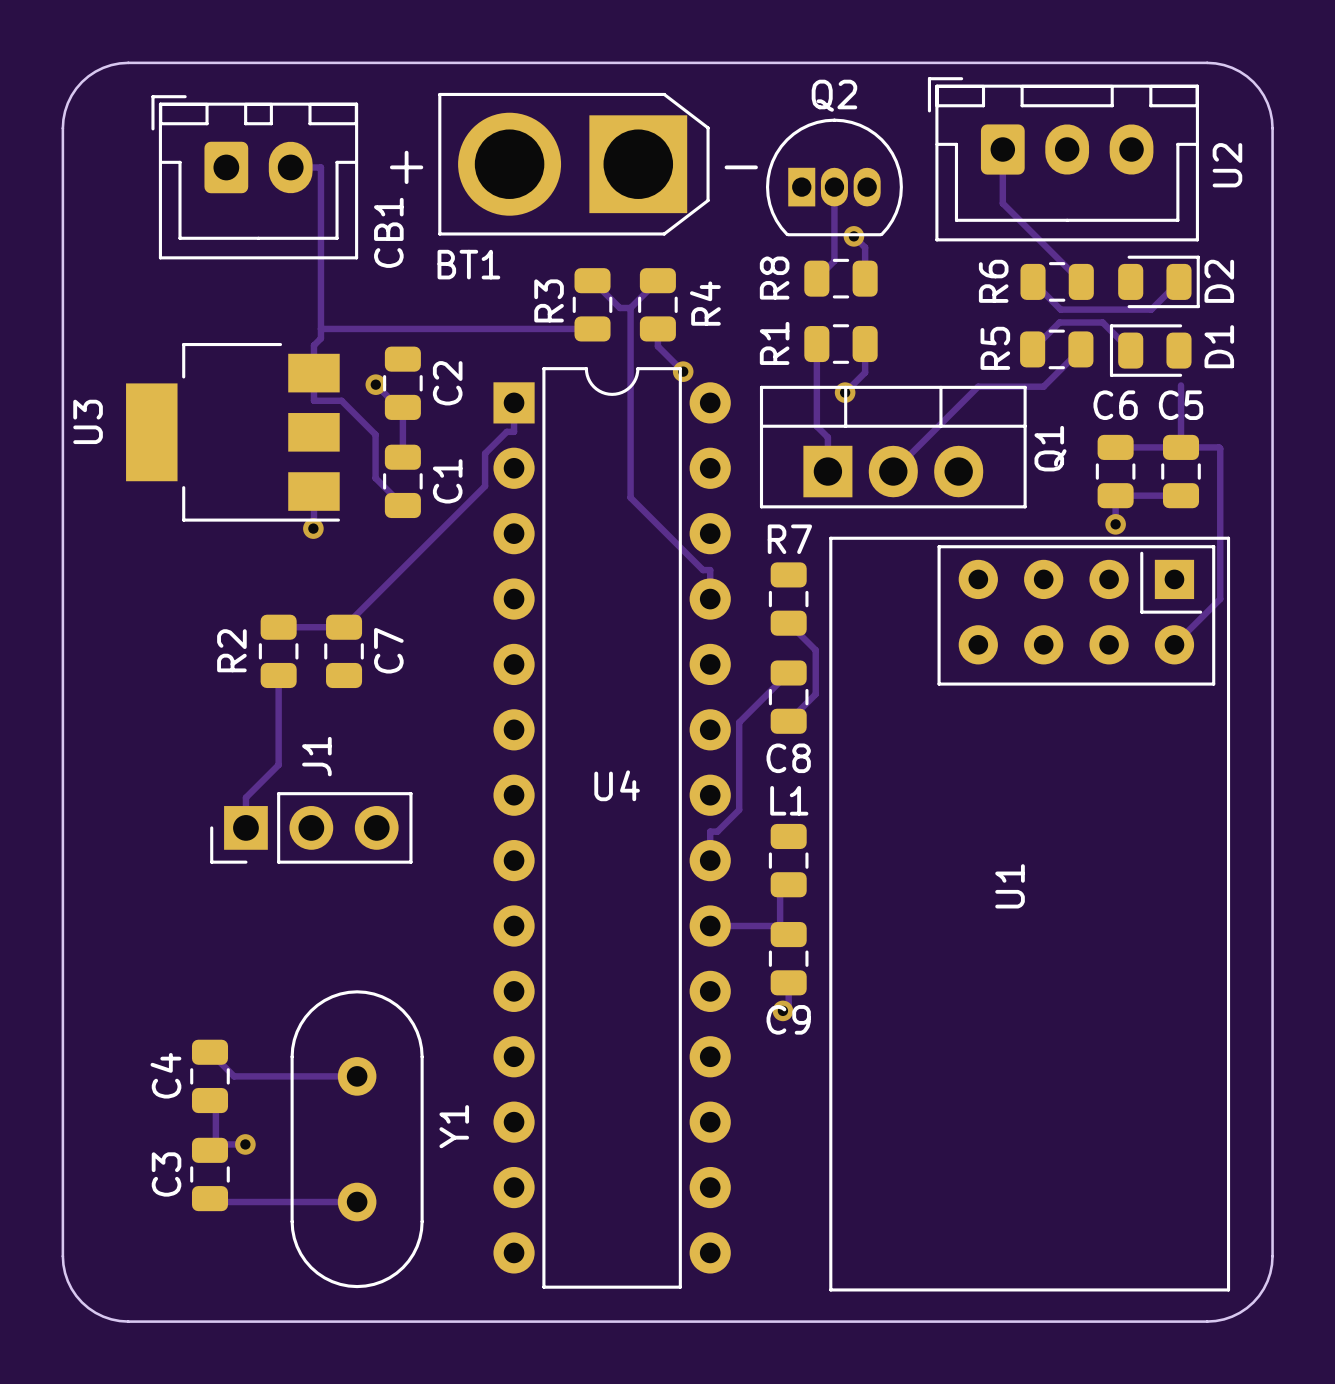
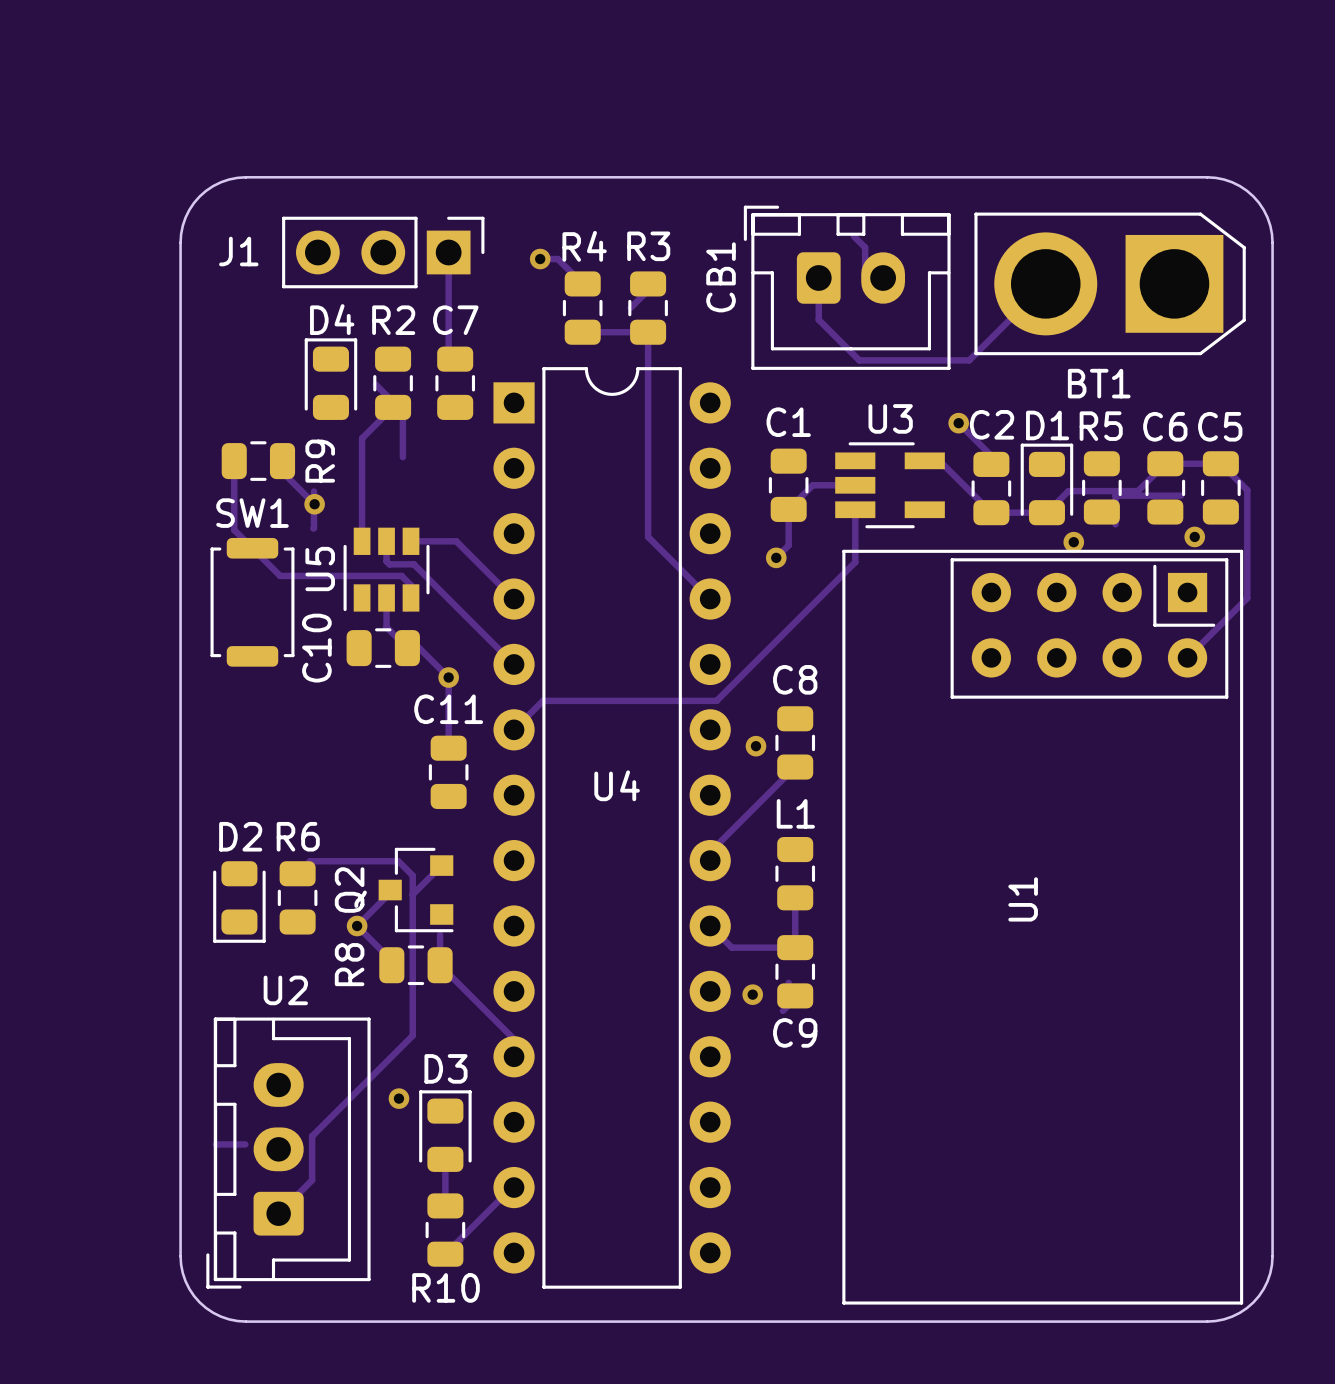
Q2 name position: Q2 (834, 95) -> Q2 (350, 890)
Q2 footprint: [765, 118, 903, 237] -> [378, 847, 454, 933]
track: (1002, 149) (1002, 203) (1081, 281) -> none
U2 rotation: 0° (1063, 159) -> 90° counterclockwise (288, 1153)
U2 position: (1063, 159) -> (288, 1153)
BT1 position: (573, 164) -> (1110, 283)
track: (290, 167) (320, 167) (320, 338) (313, 345) (313, 400) (341, 400) (375, 434) (375, 478) (402, 505) -> none
BT1 text: + (406, 167) -> none
BT1 text: - (741, 167) -> none
CB1 position: (254, 177) -> (847, 287)
track: (834, 187) (834, 261) (816, 278) -> none
CB1 name position: CB1 (388, 232) -> CB1 (721, 277)
via: (853, 236) -> none
board edge: (1272, 242) (1272, 128) (1270, 111) (1263, 95) (1253, 82) (1232, 67) (1215, 63) (128, 62) (103, 67) (82, 82) (67, 103) (62, 128) (62, 1256) (67, 1281) (82, 1302) (103, 1316) (128, 1321) -> (1272, 242) (1267, 217) (1253, 196) (1232, 182) (1207, 177)
track: none -> (448, 252) (448, 352) (455, 359)
track: none -> (540, 259) (557, 259) (582, 283)
via: none -> (540, 259)
BT1 name position: BT1 (468, 264) -> BT1 (1099, 383)
track: none -> (818, 277) (818, 319) (859, 360) (969, 360) (1045, 283)
R8 position: (840, 278) -> (415, 965)
track: (592, 280) (619, 307) (630, 307) (630, 497) (702, 570) (710, 570) (710, 599) -> (582, 332) (648, 332) (648, 536) (710, 599)
track: (1033, 281) (1060, 309) (1151, 309) (1178, 281) -> none
R6 rotation: 0° (1057, 281) -> 90° clockwise (297, 897)
R6 position: (1057, 281) -> (297, 897)
D2 rotation: 0° (1158, 281) -> 90° clockwise (239, 901)
D2 position: (1158, 281) -> (239, 901)
D2 name position: D2 (1219, 281) -> D2 (240, 836)
R3 name rotation: 0° (549, 300) -> 90° clockwise (648, 246)
R3 name position: R3 (549, 300) -> R3 (648, 246)
R4 name rotation: 0° (705, 303) -> 90° clockwise (584, 246)
R4 name position: R4 (705, 303) -> R4 (584, 246)
R3 position: (592, 304) -> (648, 308)
R4 position: (657, 304) -> (582, 308)
track: (320, 328) (592, 328) -> none
track: (657, 328) (657, 346) (683, 371) -> none
U3 footprint: [126, 342, 340, 522] -> [835, 442, 945, 529]
track: (816, 344) (816, 426) (827, 437) (827, 471) -> none
R1: (840, 344) -> none
track: (865, 344) (865, 372) (845, 392) -> none
D1 name position: D1 (1219, 346) -> D1 (1047, 425)
track: (1032, 349) (1059, 322) (1102, 322) (1130, 350) -> none
R5 rotation: 0° (1056, 349) -> 90° clockwise (1101, 487)
R5 position: (1056, 349) -> (1101, 487)
track: (1080, 349) (1043, 386) (978, 386) (893, 471) -> none
D1 rotation: 0° (1150, 350) -> 90° clockwise (1046, 484)
D1 position: (1150, 350) -> (1046, 484)
via: (683, 371) -> none
D4: none -> (330, 379)
C2 position: (402, 383) -> (991, 488)
C2 name rotation: 0° (447, 383) -> 90° clockwise (992, 424)
C2 name position: C2 (447, 383) -> C2 (992, 424)
via: (375, 384) -> none
track: (1181, 385) (1181, 447) -> none
via: (845, 392) -> none
track: (514, 402) (514, 431) (506, 431) (485, 453) (485, 486) (344, 627) (278, 627) -> none
C6 name position: C6 (1115, 405) -> C6 (1165, 426)
C5 name position: C5 (1181, 405) -> C5 (1220, 426)
track: none -> (393, 407) (362, 438) (362, 541)
U3 name position: U3 (88, 421) -> U3 (890, 418)
track: none -> (958, 423) (991, 455) (991, 464)
via: none -> (958, 423)
Q1: (893, 447) -> none
track: (1115, 447) (1220, 448) (1220, 599) (1174, 644) -> none
track: none -> (924, 460) (939, 460) (991, 512) (1046, 512) (1068, 491) (1137, 491) (1165, 463) (1220, 463) (1247, 490) (1247, 598) (1187, 657)
track: none -> (234, 461) (234, 530) (280, 575) (401, 575) (411, 585) (411, 597)
R9: none -> (258, 461)
C6 position: (1115, 471) -> (1165, 487)
C5 position: (1181, 471) -> (1220, 487)
track: none -> (282, 472) (314, 504)
C1 position: (402, 481) -> (788, 485)
C1 name rotation: 0° (447, 481) -> 90° clockwise (788, 422)
C1 name position: C1 (447, 481) -> C1 (788, 422)
track: none -> (855, 485) (812, 485) (788, 509) (788, 545) (776, 557)
track: none -> (855, 509) (855, 562) (716, 700) (543, 700) (514, 729)
via: (1115, 524) -> none
via position: (313, 528) -> (314, 504)
via: none -> (1194, 536)
track: none -> (386, 541) (386, 561) (389, 564) (413, 564) (514, 664) (514, 647)
track: none -> (411, 541) (456, 541) (514, 599)
via: none -> (1073, 542)
via: none -> (776, 557)
U5: none -> (386, 569)
track: none -> (386, 597) (386, 627) (407, 648) (419, 648) (448, 677) (448, 748)
R7: (788, 599) -> none
SW1: none -> (252, 602)
track: (788, 623) (815, 650) (815, 694) (788, 721) -> none
C10: none -> (383, 648)
R2 name rotation: 0° (231, 650) -> 90° clockwise (393, 320)
R2 name position: R2 (231, 650) -> R2 (393, 320)
C7 name rotation: 0° (388, 650) -> 90° clockwise (455, 320)
C7 name position: C7 (388, 650) -> C7 (455, 320)
C7 position: (278, 651) -> (455, 383)
R2 position: (344, 651) -> (393, 383)
track: (788, 673) (739, 722) (739, 809) (717, 831) (710, 831) (710, 852) -> (795, 767) (710, 852)
track: (278, 675) (278, 764) (245, 797) (245, 827) -> none
via: none -> (448, 677)
C8 position: (788, 697) -> (795, 742)
via: none -> (755, 746)
J1 name position: J1 (316, 756) -> J1 (238, 251)
C8 name position: C8 (788, 758) -> C8 (795, 679)
C11: none -> (448, 772)
J1 rotation: 0° (311, 827) -> 180° (383, 252)
J1 position: (311, 827) -> (383, 252)
L1 position: (788, 860) -> (795, 873)
track: none -> (440, 865) (441, 865) (412, 894)
track: none -> (297, 873) (310, 861) (398, 861) (412, 875) (412, 1035) (312, 1136) (312, 1180) (278, 1213)
track: (788, 884) (780, 893) (780, 925) -> none
track: none -> (390, 890) (390, 892) (357, 925) (391, 960) (391, 965)
track: none -> (795, 897) (795, 947) (731, 947) (710, 925) (712, 923)
U1 position: (1029, 914) -> (1042, 927)
via: none -> (357, 925)
track: (710, 925) (780, 925) -> none
track: none -> (440, 934) (440, 965) (514, 1039)
C9 position: (788, 958) -> (795, 971)
via position: (782, 1010) -> (752, 994)
track: (209, 1052) (234, 1076) (357, 1076) -> none
C4: (209, 1076) -> none
via: none -> (398, 1098)
track: (209, 1100) (215, 1106) (215, 1144) (209, 1150) -> none
D3: none -> (445, 1131)
Y1: (357, 1139) -> none
via: (245, 1144) -> none
track: none -> (445, 1159) (445, 1205)
C3: (209, 1174) -> none
track: none -> (514, 1187) (445, 1254)
track: (209, 1198) (213, 1202) (357, 1202) -> none
R10: none -> (445, 1230)
board edge: (128, 1321) (245, 1321) -> (1207, 177) (245, 177) (229, 179) (213, 186) (194, 202) (182, 225) (180, 242) (180, 1256) (185, 1281) (199, 1302) (220, 1316) (245, 1321)

